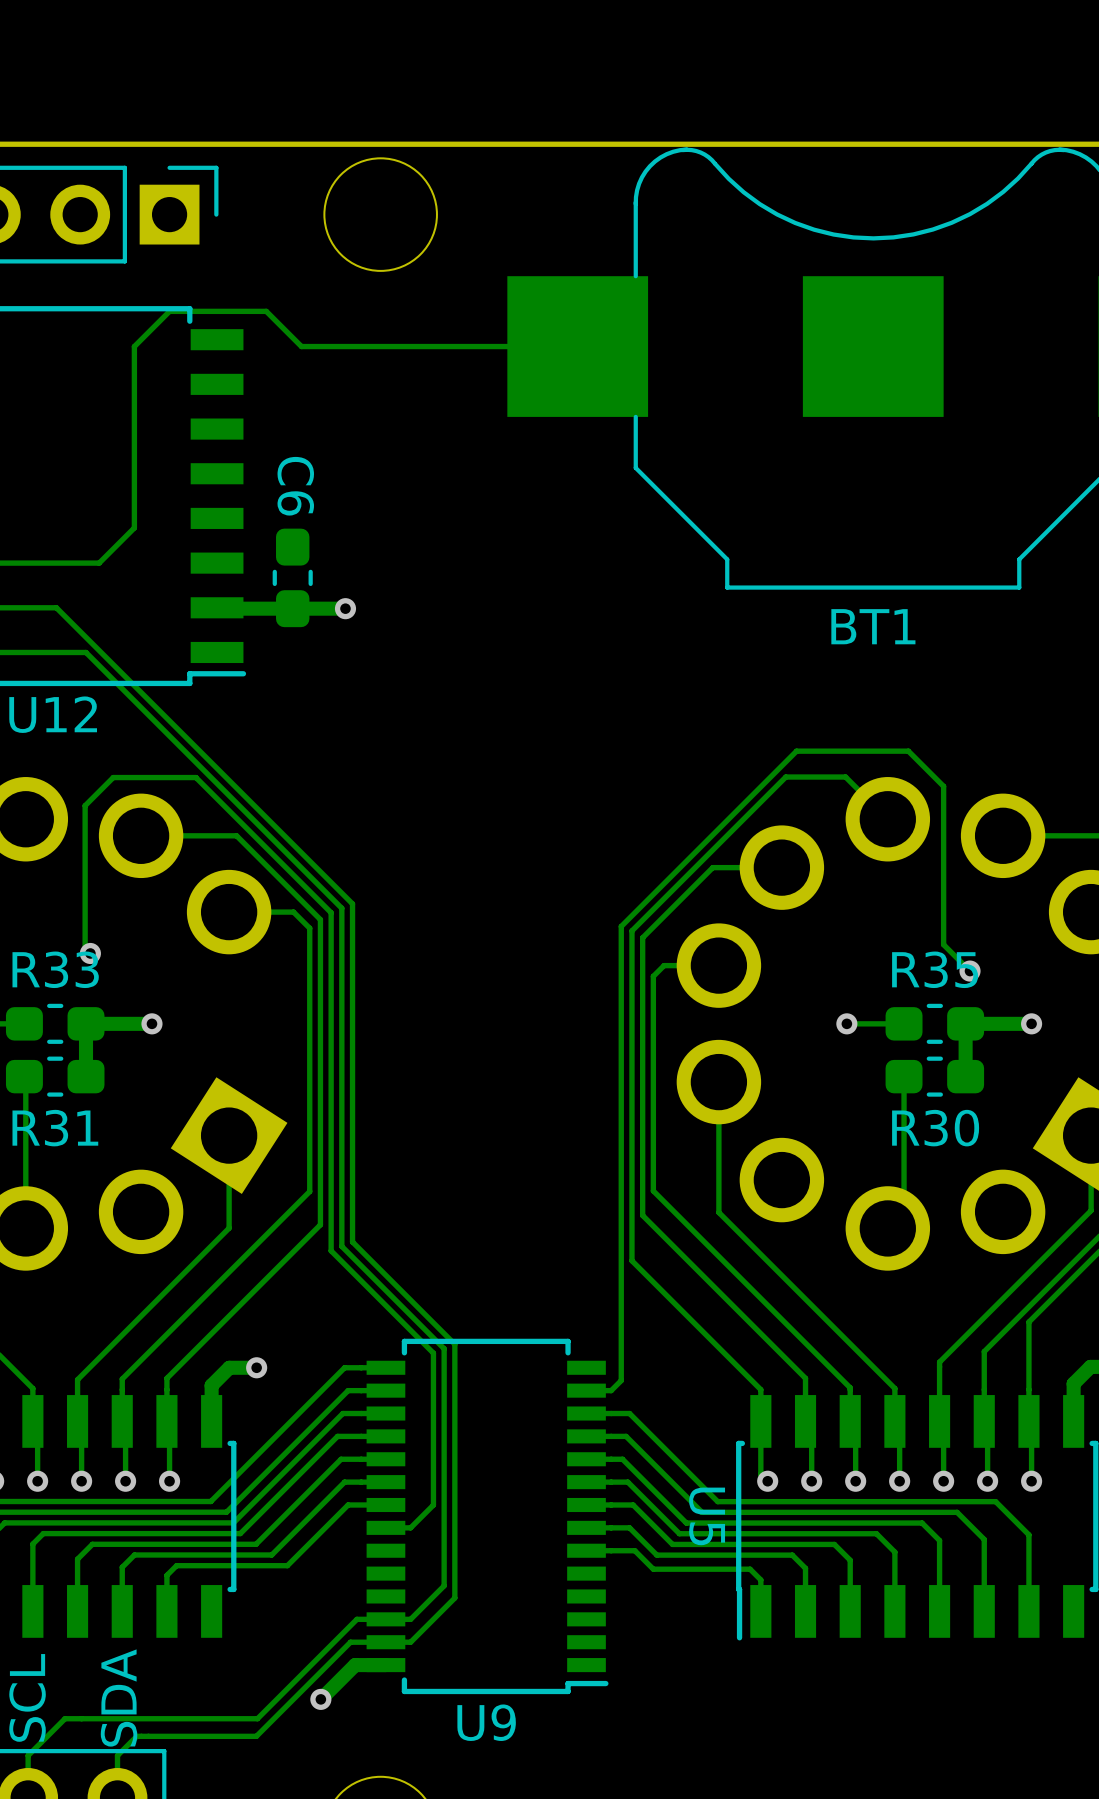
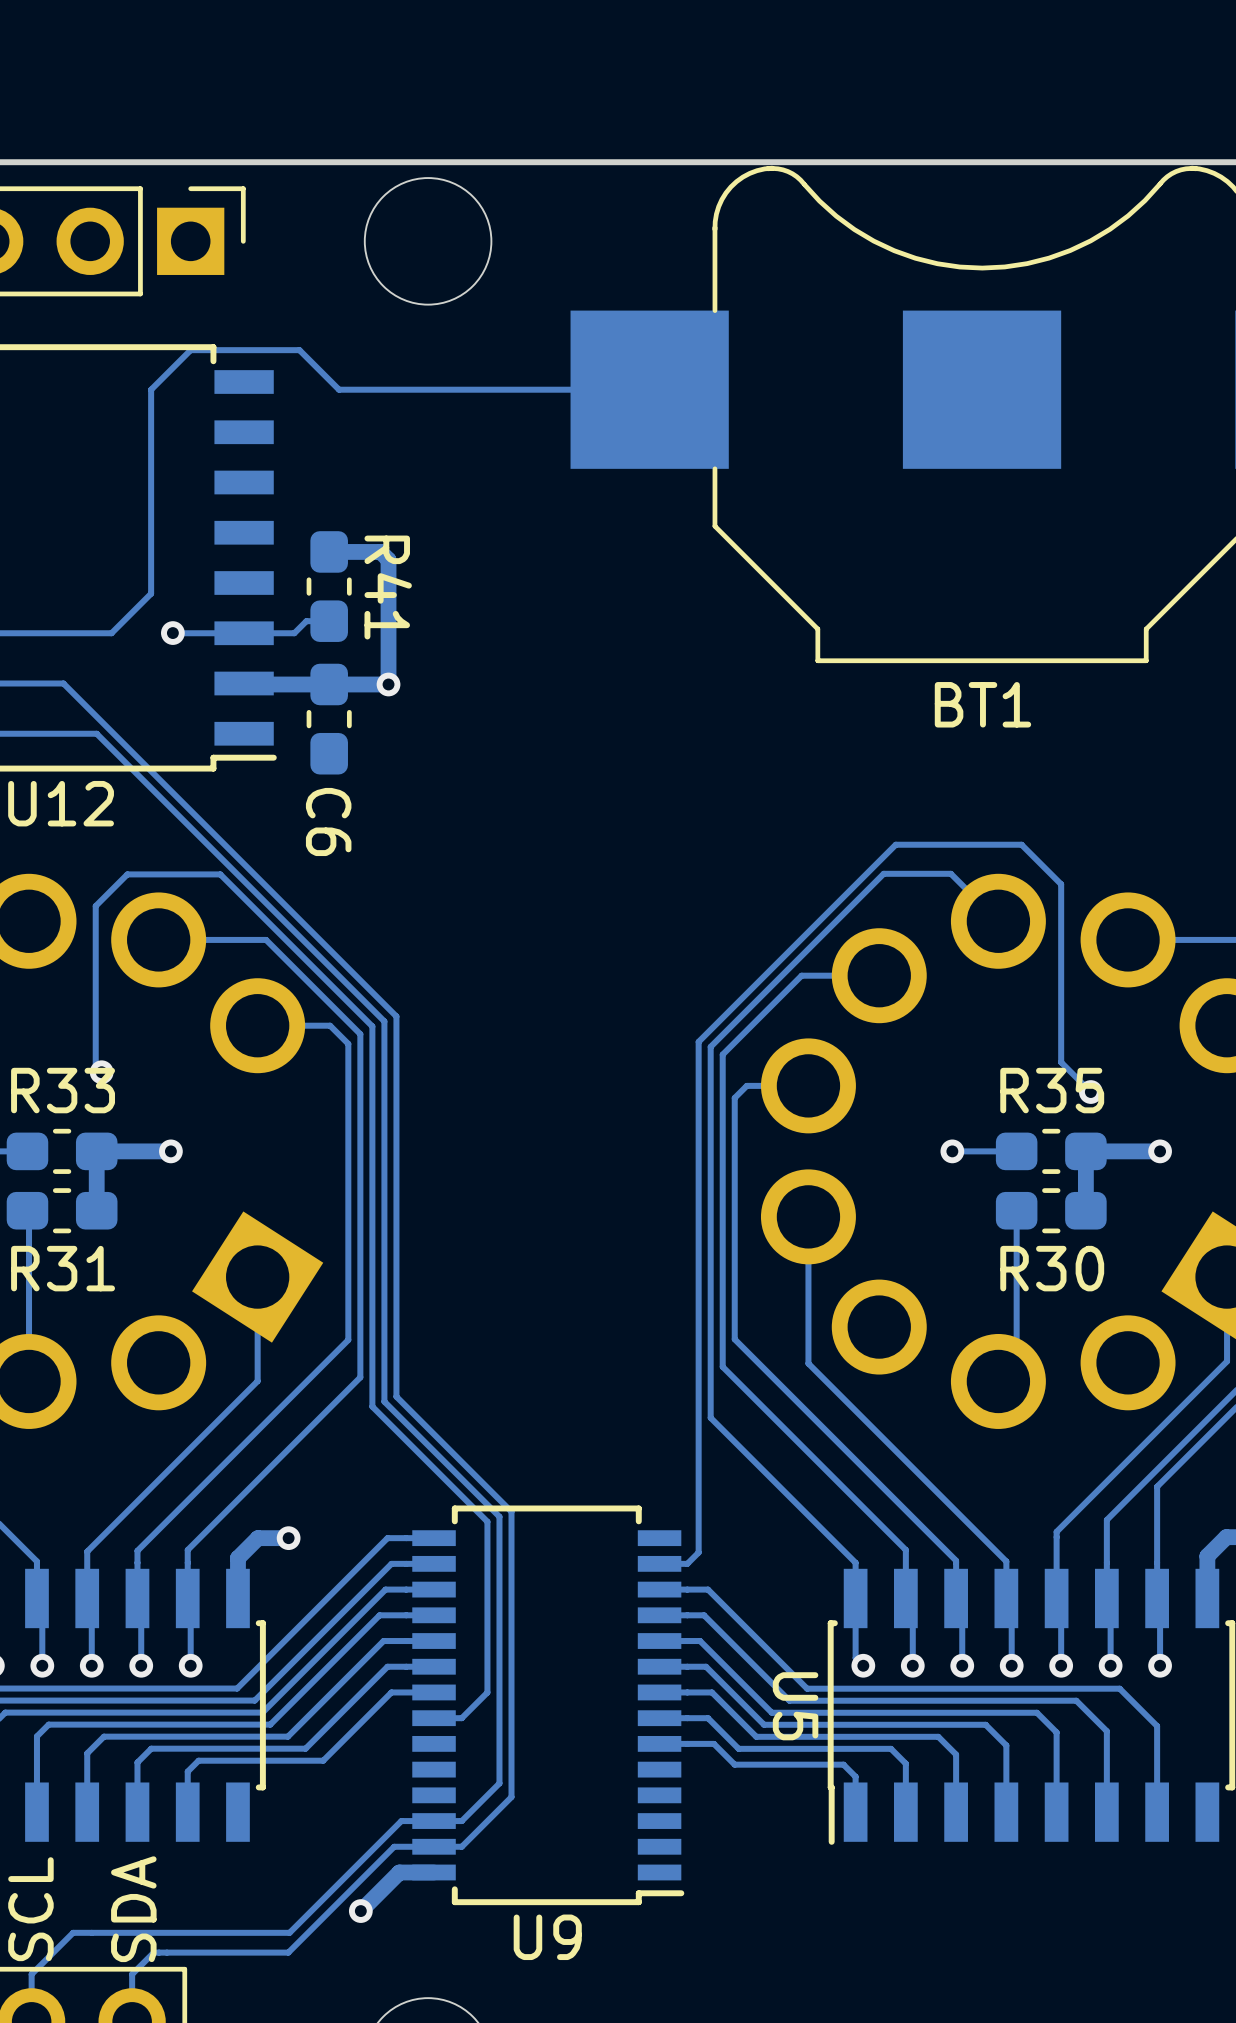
C6 name position: C6 (295, 486) -> C6 (328, 821)
track: none -> (329, 551) (380, 551) (388, 559) (388, 684)
R41: none -> (329, 586)
track: none -> (329, 621) (306, 621) (294, 633) (173, 633)
via: none -> (172, 633)
C6 position: (292, 577) -> (329, 719)

